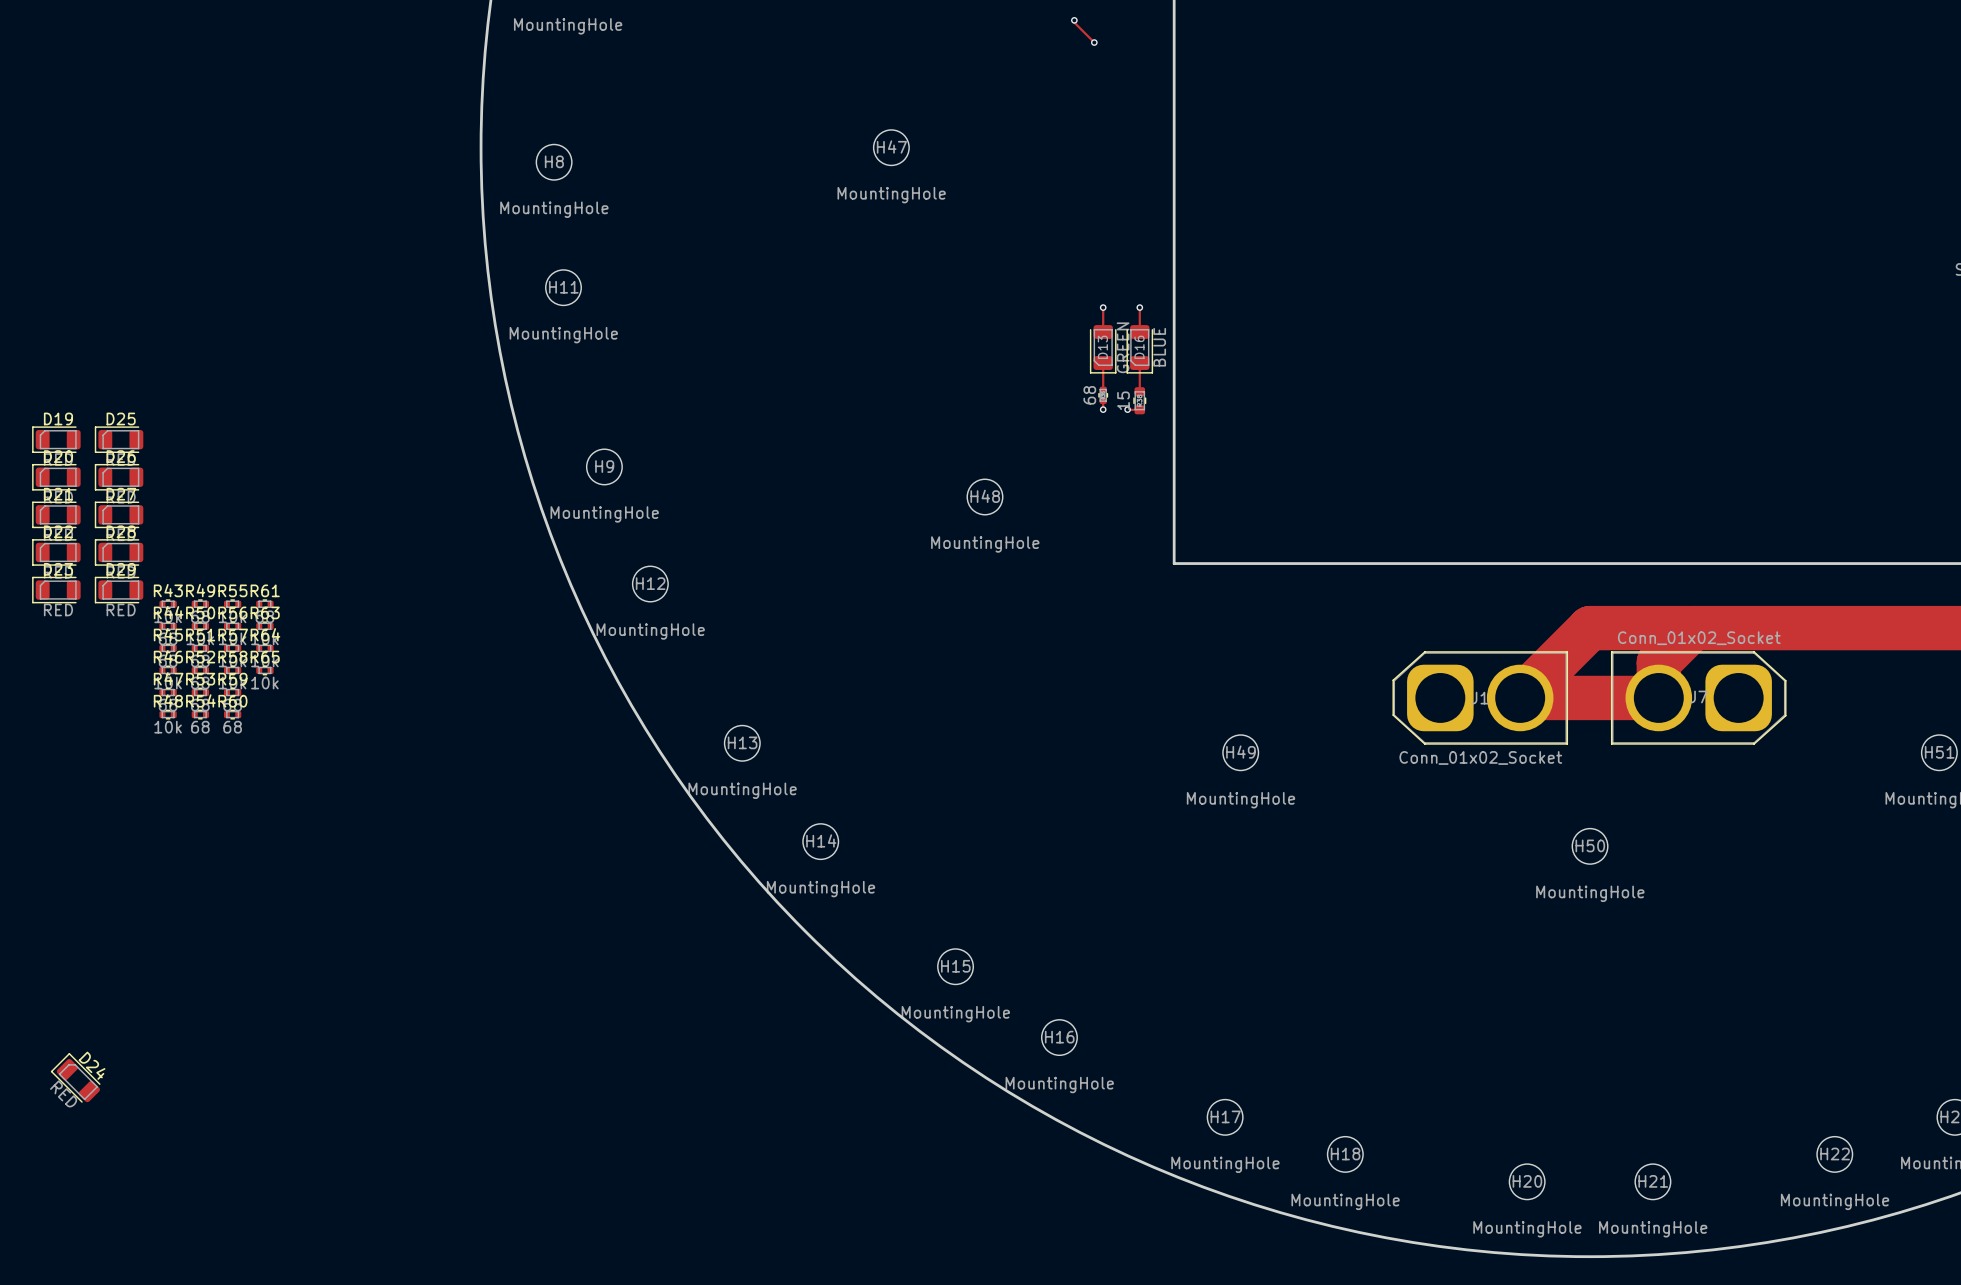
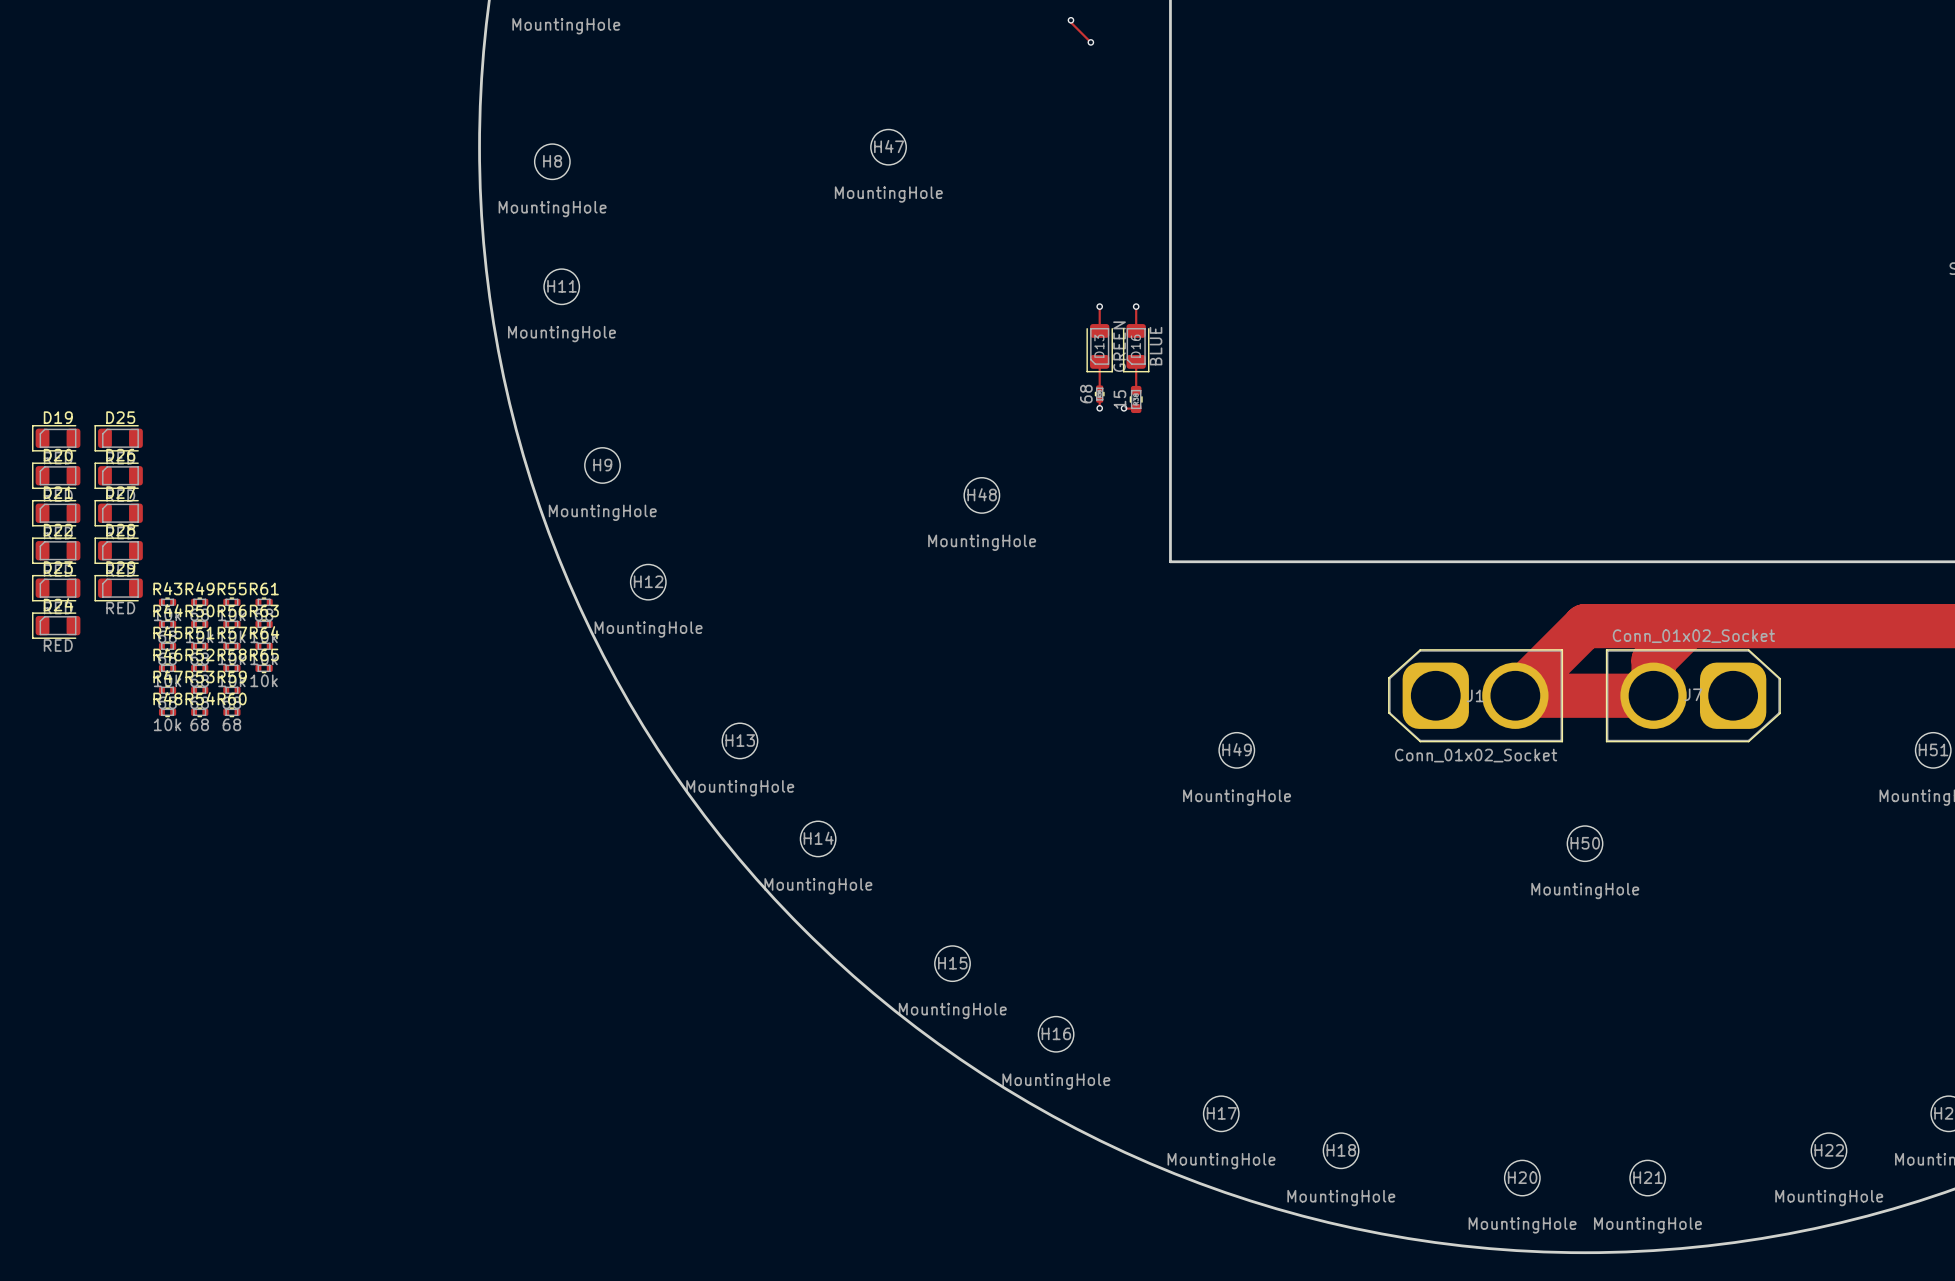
D24 rotation: 0° (75, 1077) -> 45° counterclockwise (56, 625)
D24 position: (75, 1077) -> (56, 625)

